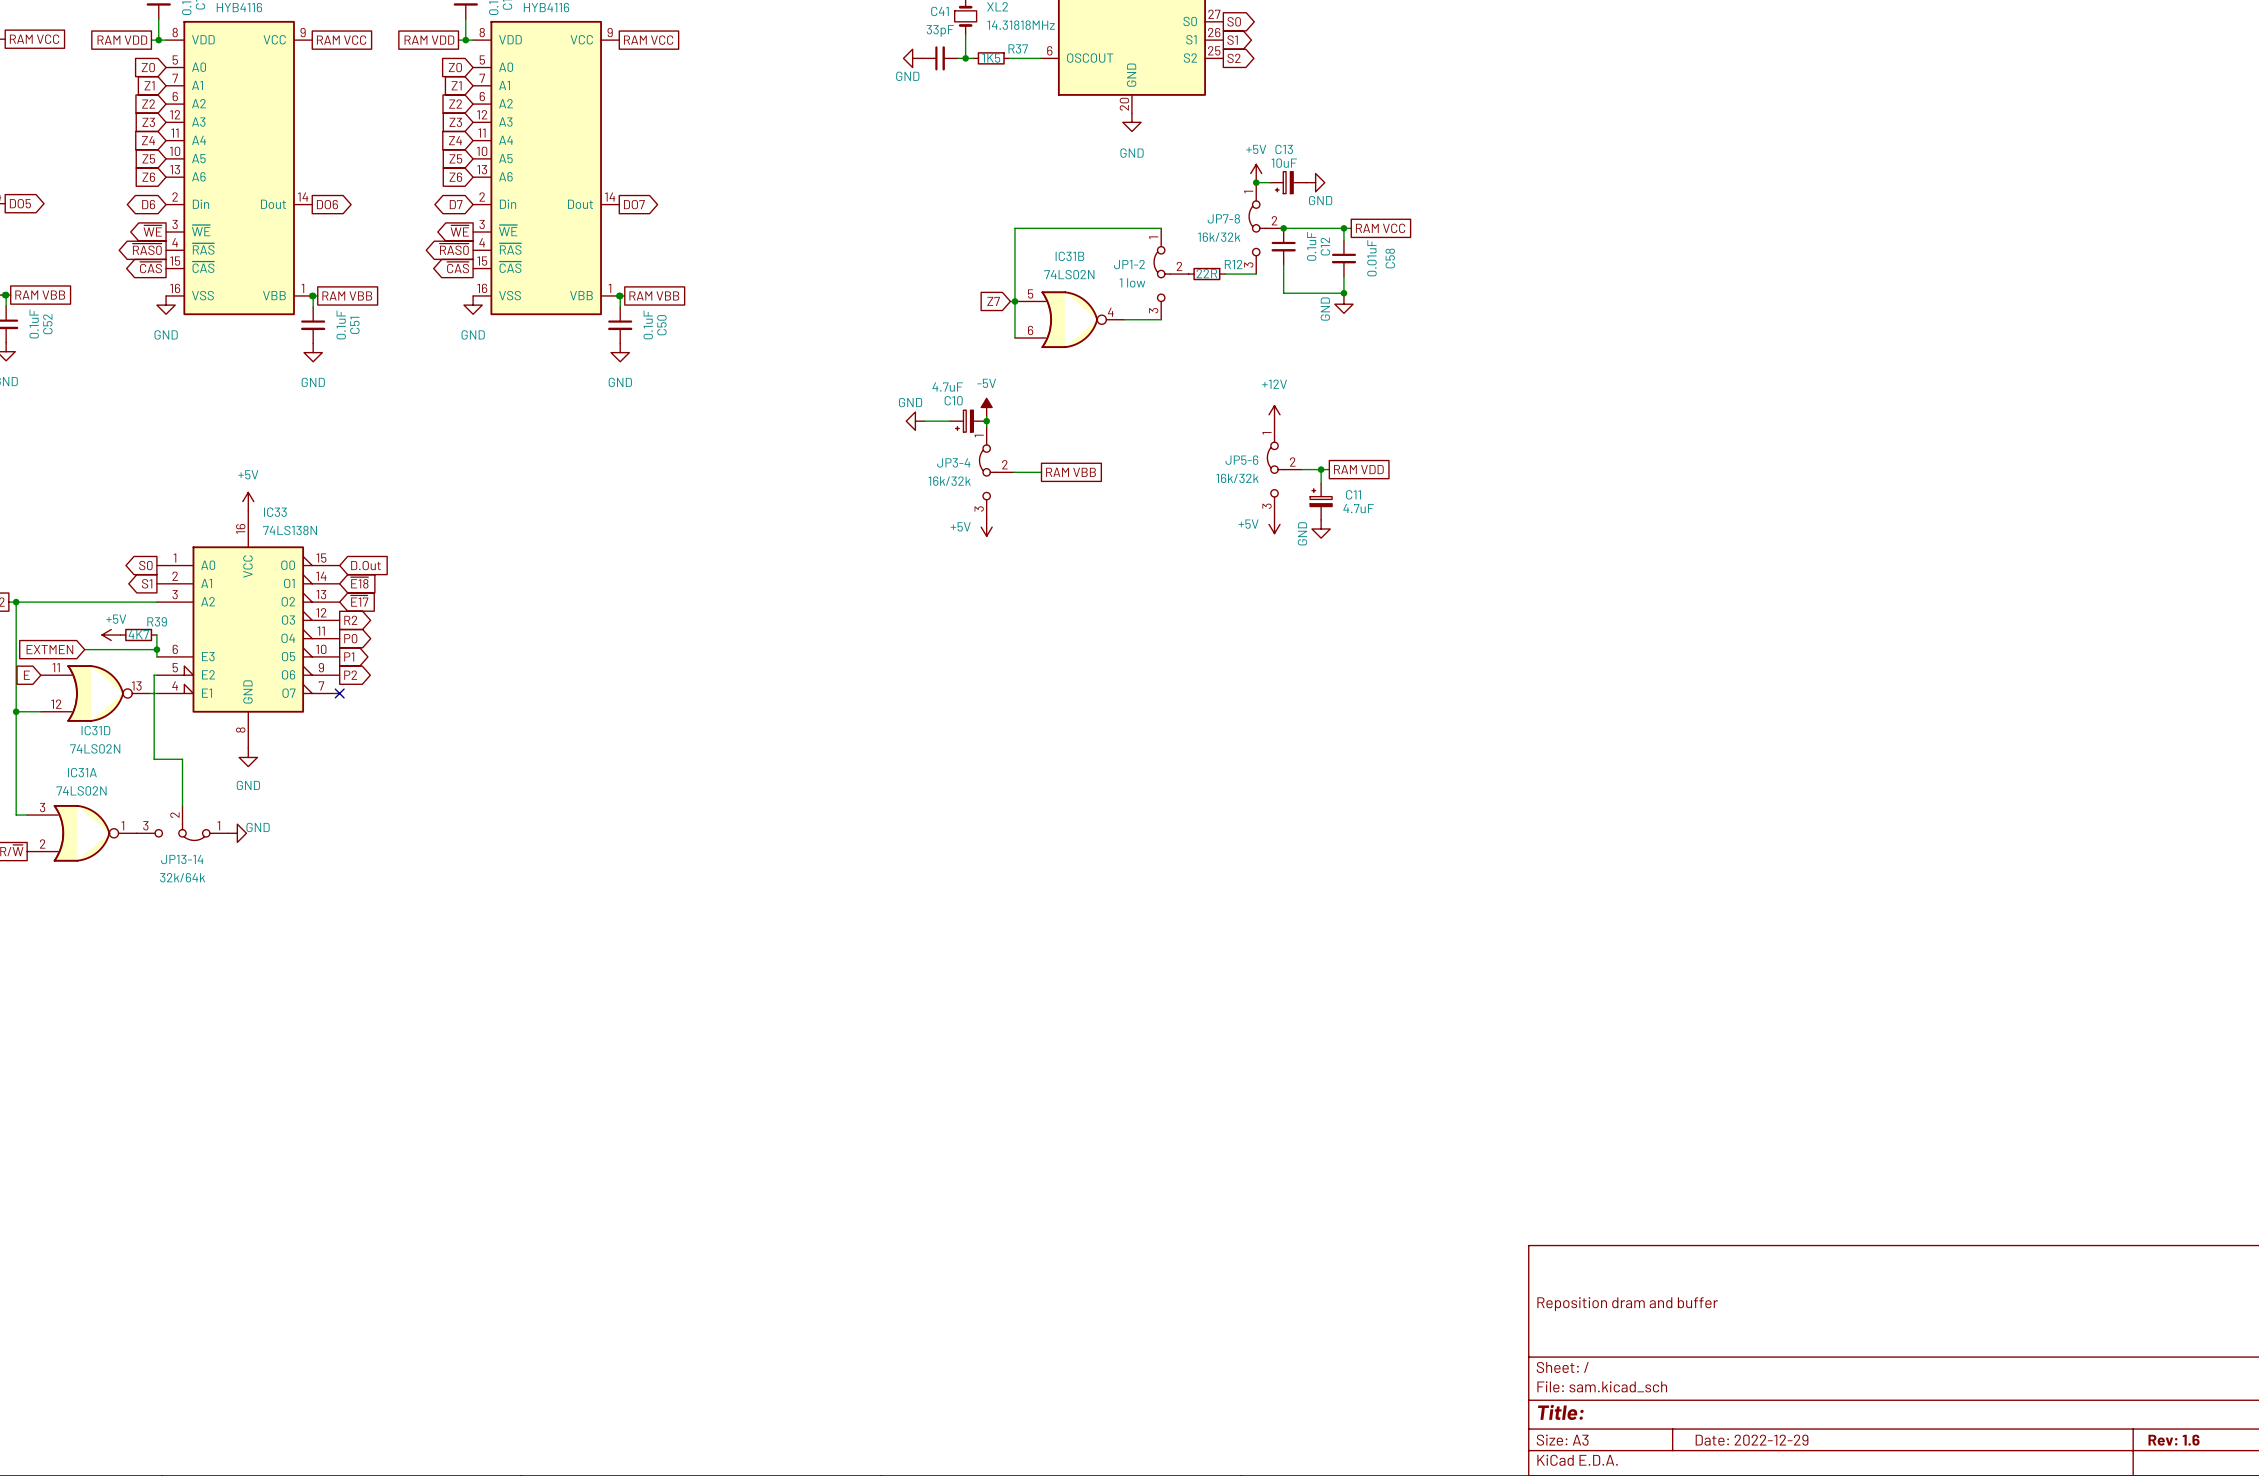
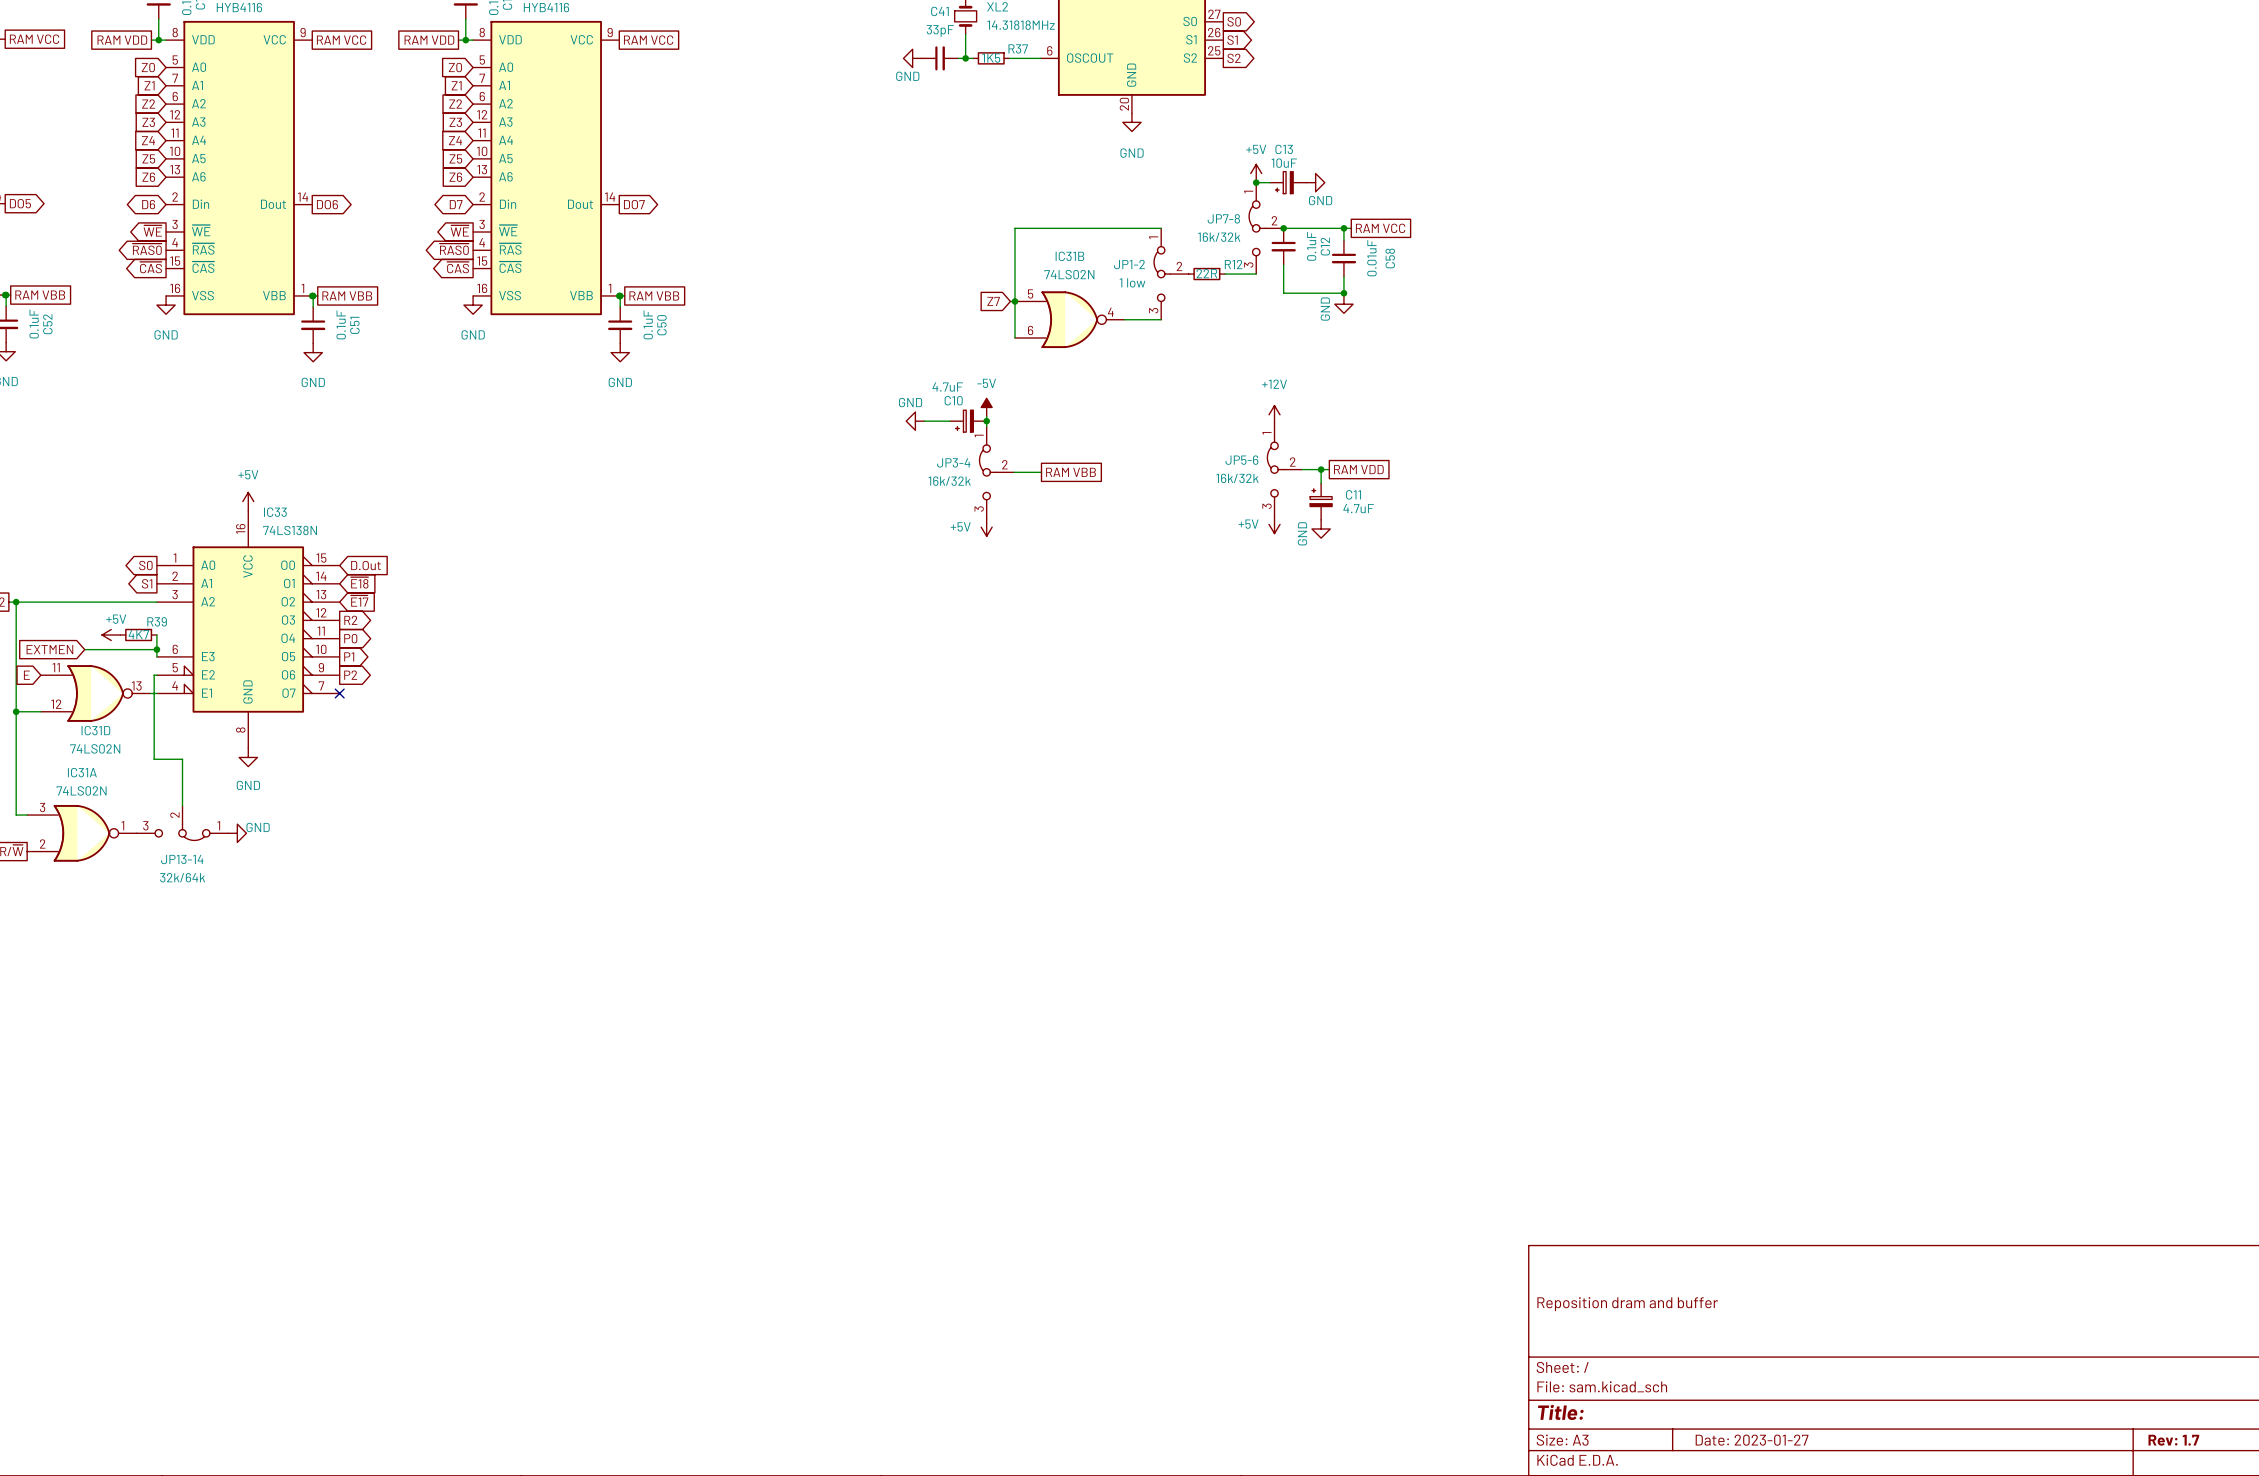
title block: Date: 2022-12-29 (1752, 1440) -> Date: 2023-01-27 (1752, 1440)
title block: Rev: 1.6 (2174, 1440) -> Rev: 1.7 (2173, 1440)

